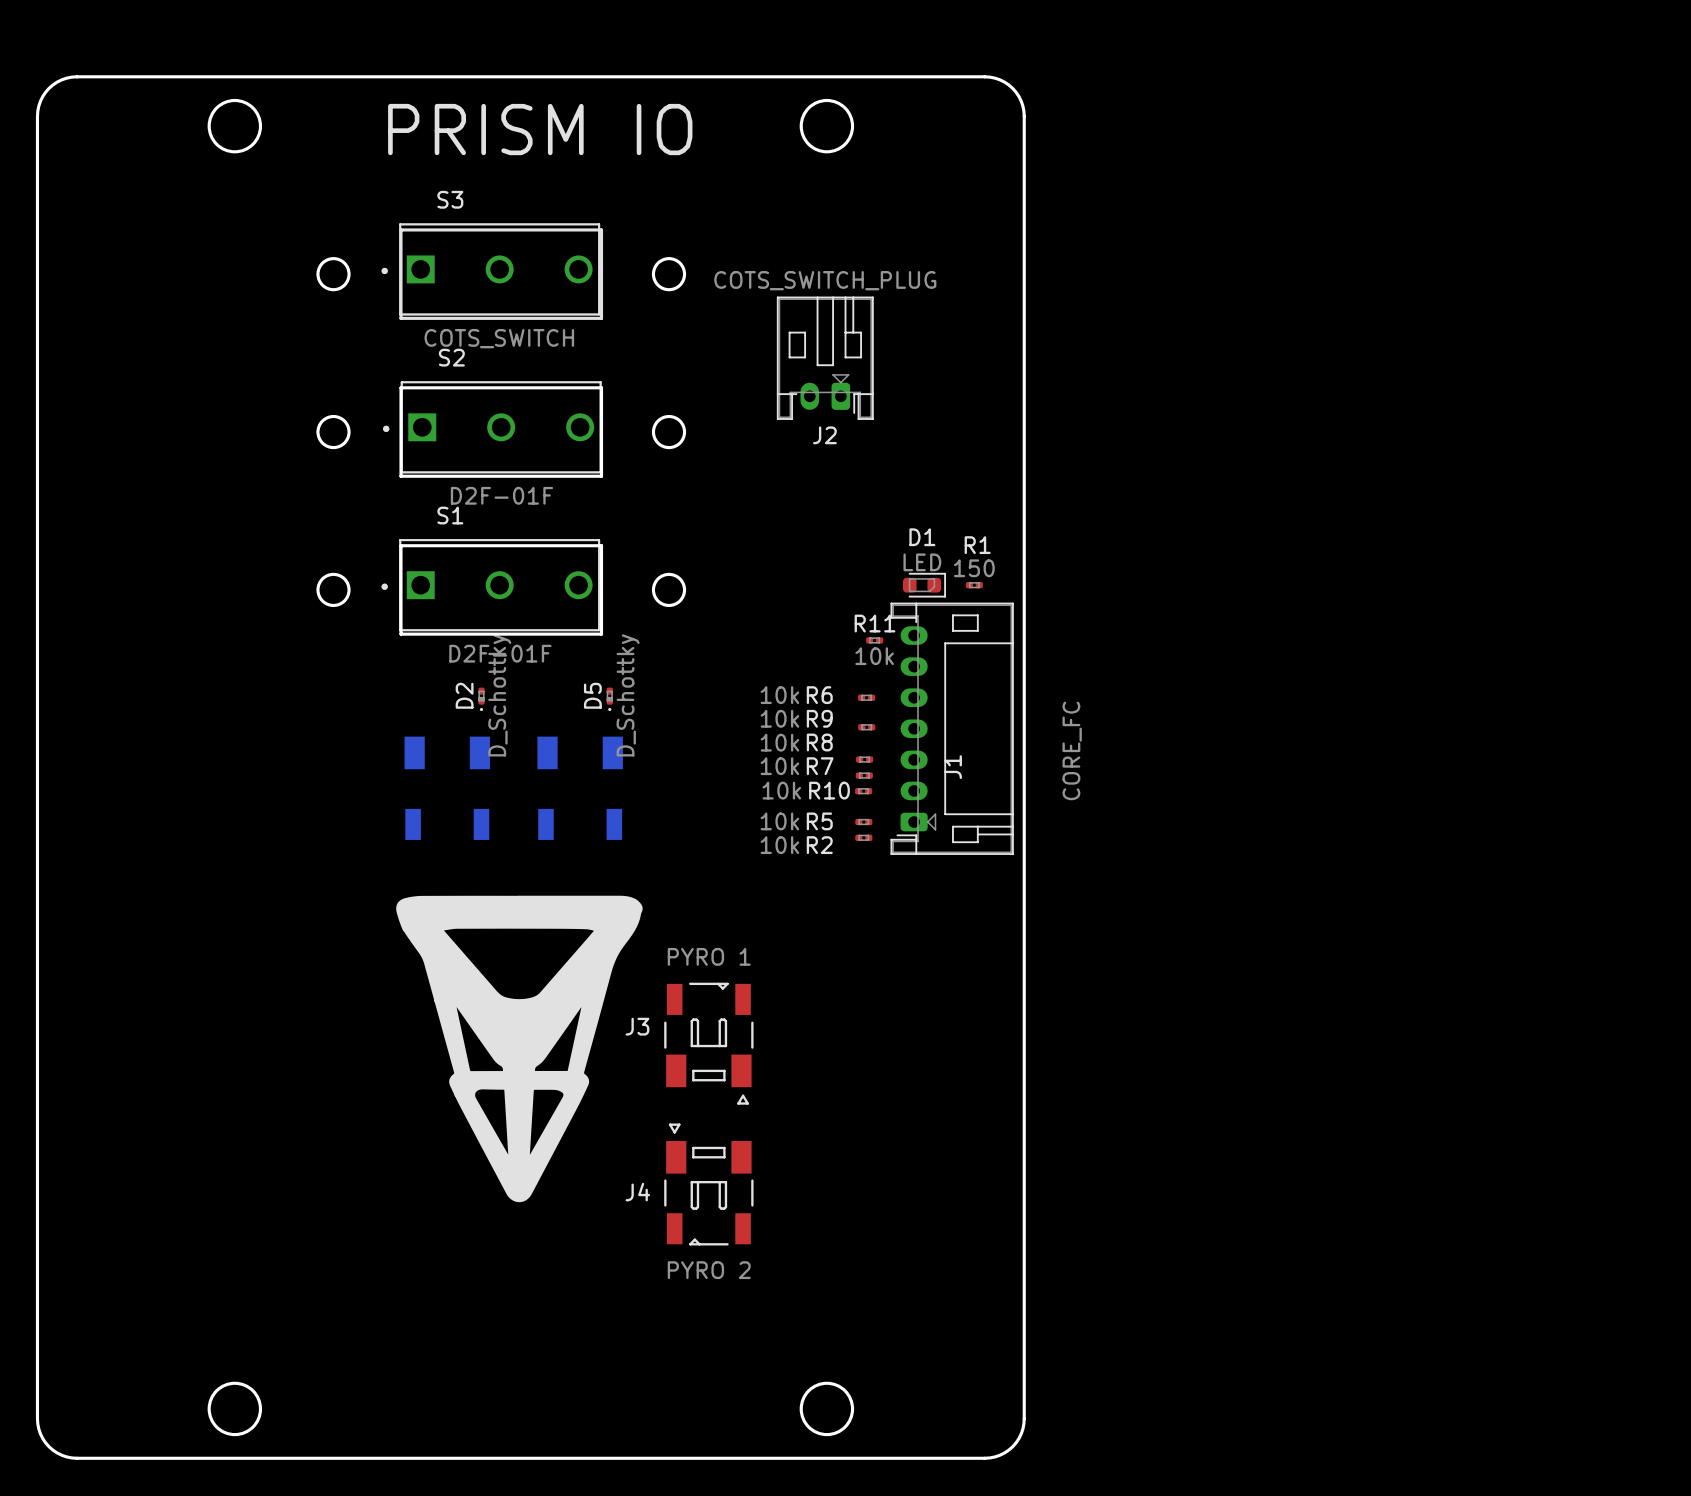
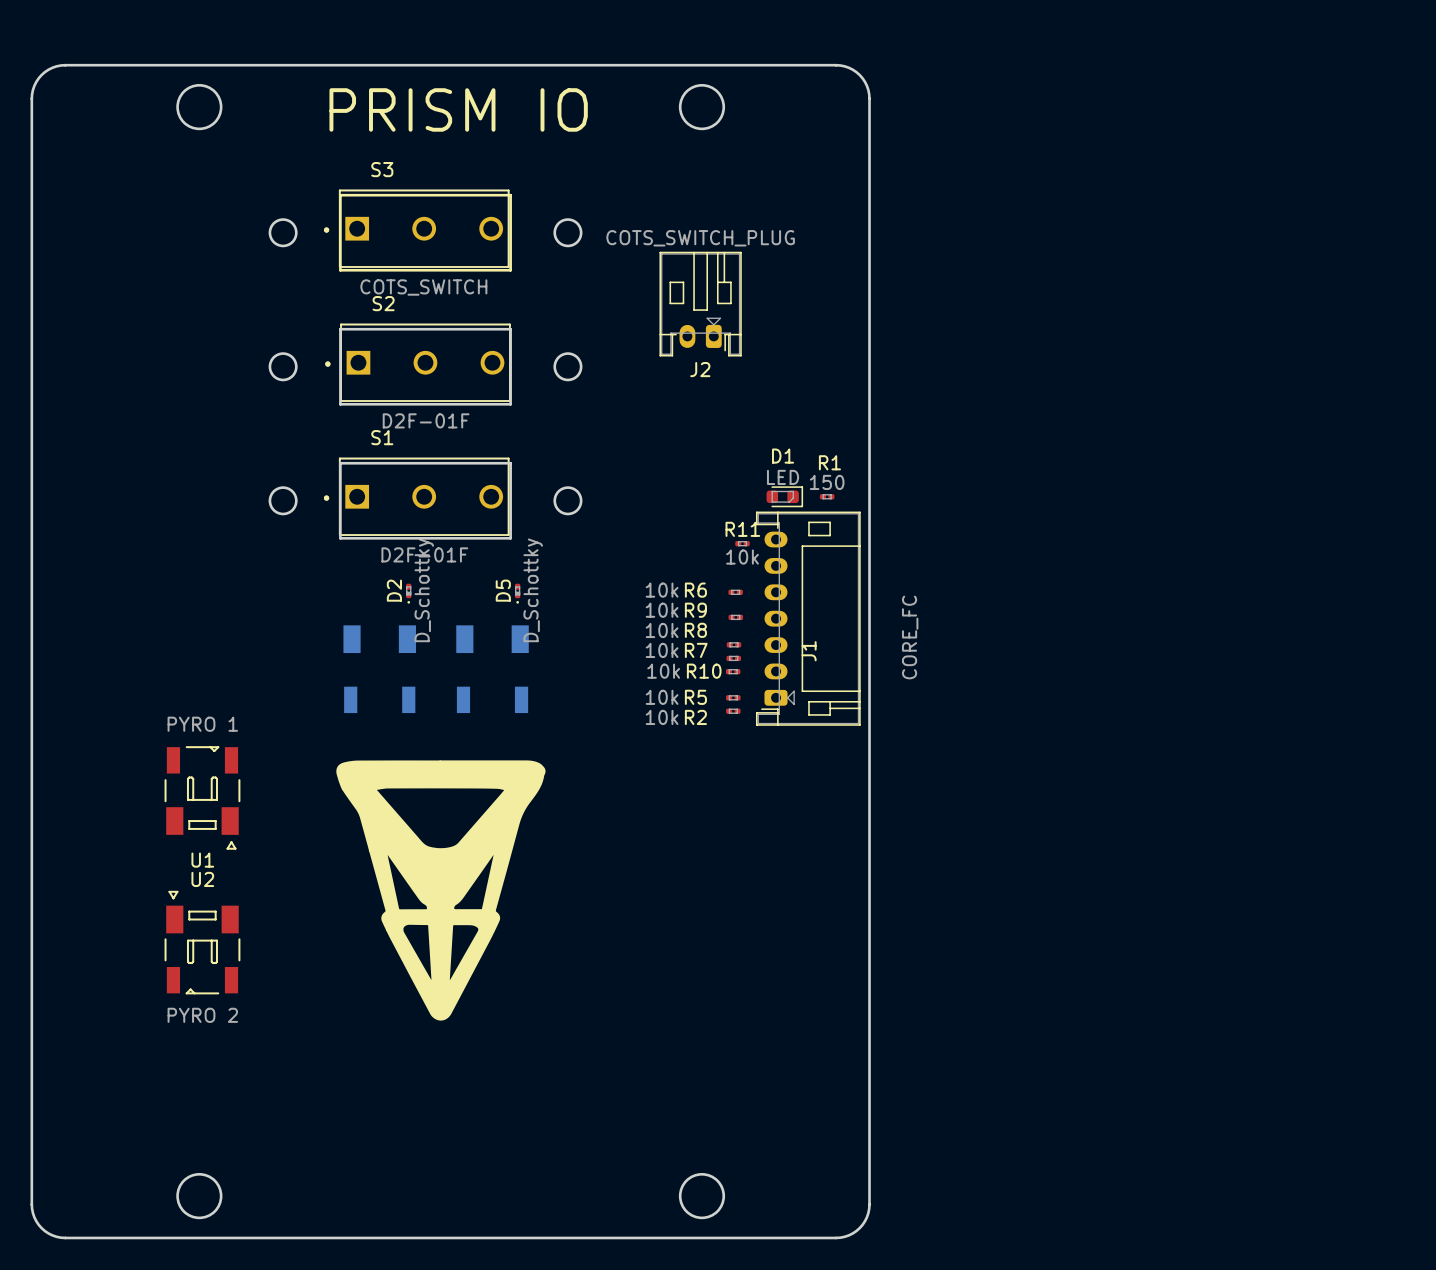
U1: none -> PYRO 1 (202, 797)
J3: PYRO 1 (708, 1043) -> none
U2: none -> PYRO 2 (202, 942)
J4: PYRO 2 (708, 1184) -> none

